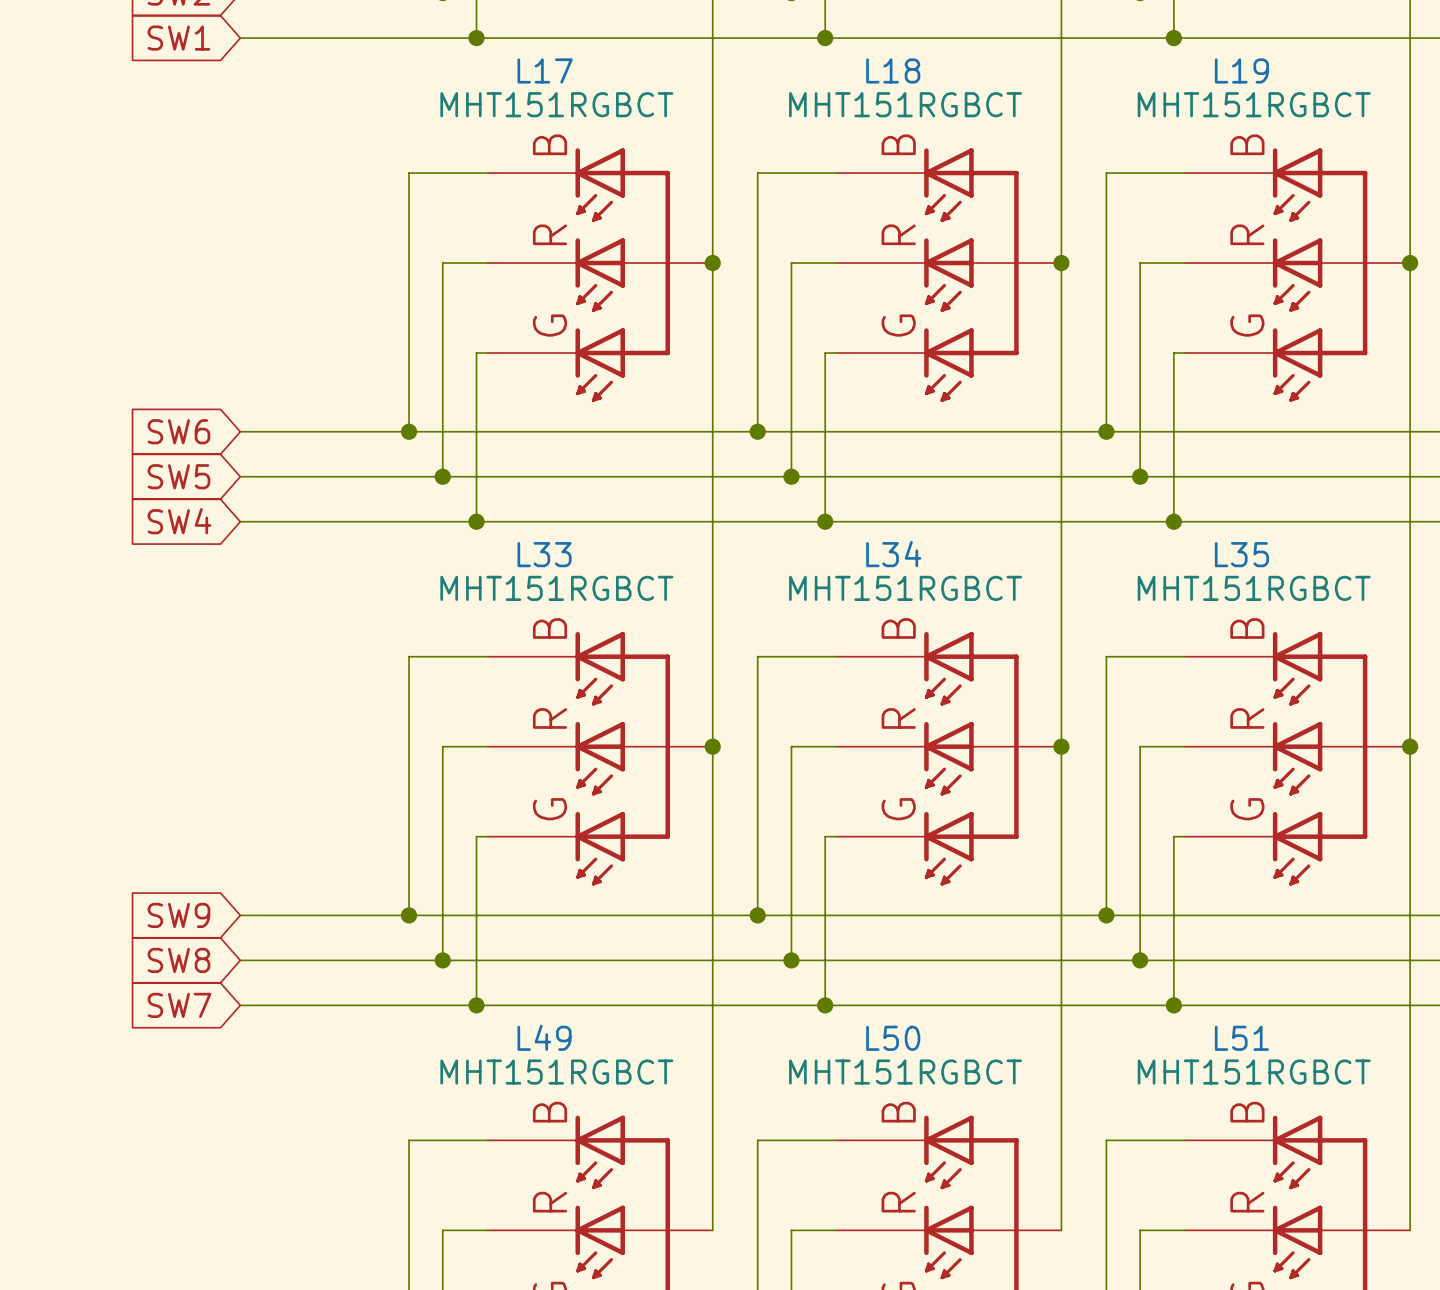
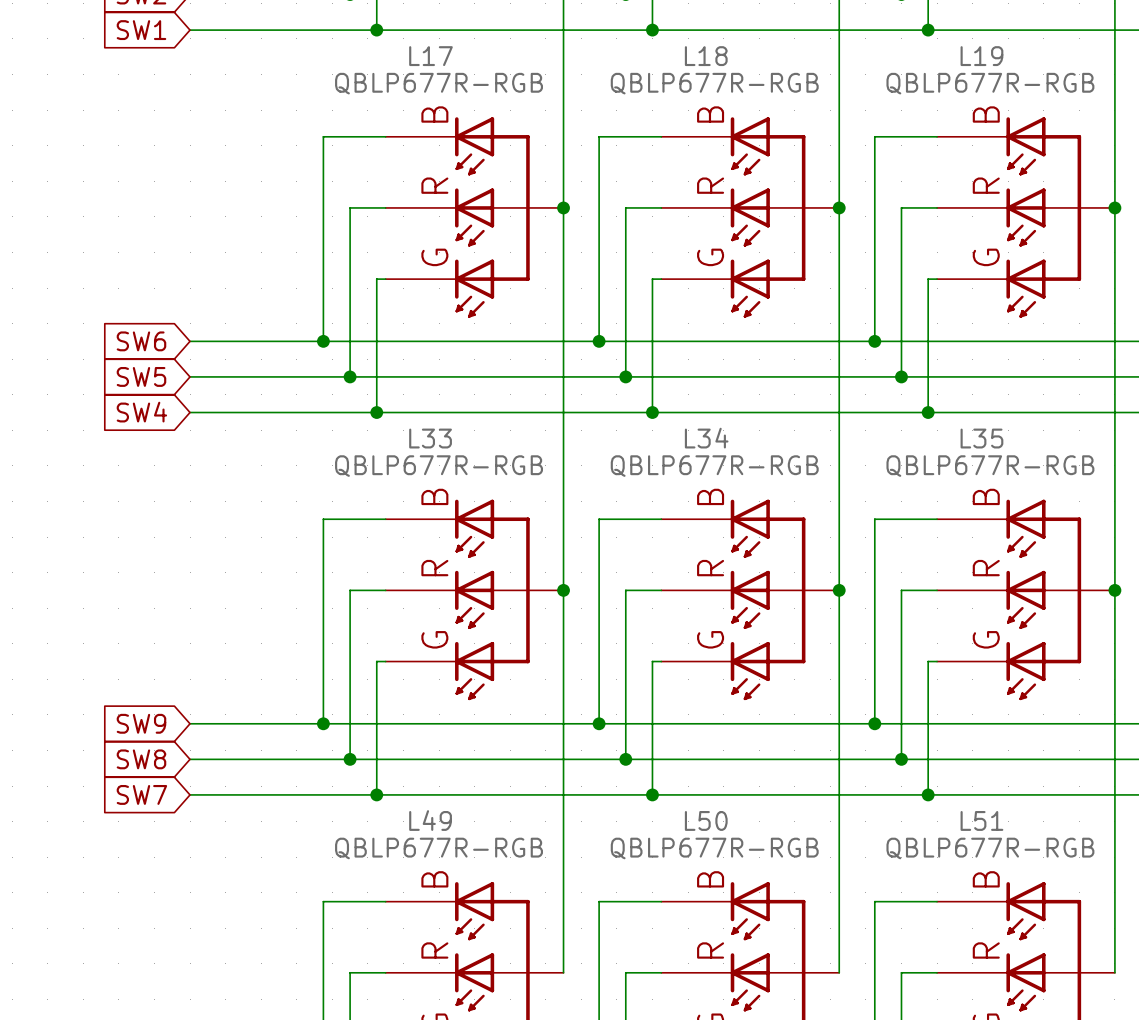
L17 value: MHT151RGBCT (556, 104) -> QBLP677R-RGB (439, 83)
L18 value: MHT151RGBCT (905, 104) -> QBLP677R-RGB (714, 83)
L19 value: MHT151RGBCT (1254, 104) -> QBLP677R-RGB (990, 83)
L33 value: MHT151RGBCT (556, 588) -> QBLP677R-RGB (439, 466)
L34 value: MHT151RGBCT (905, 588) -> QBLP677R-RGB (714, 466)
L35 value: MHT151RGBCT (1254, 588) -> QBLP677R-RGB (990, 466)
L49 value: MHT151RGBCT (556, 1072) -> QBLP677R-RGB (439, 848)
L50 value: MHT151RGBCT (905, 1072) -> QBLP677R-RGB (714, 848)
L51 value: MHT151RGBCT (1254, 1072) -> QBLP677R-RGB (990, 848)

